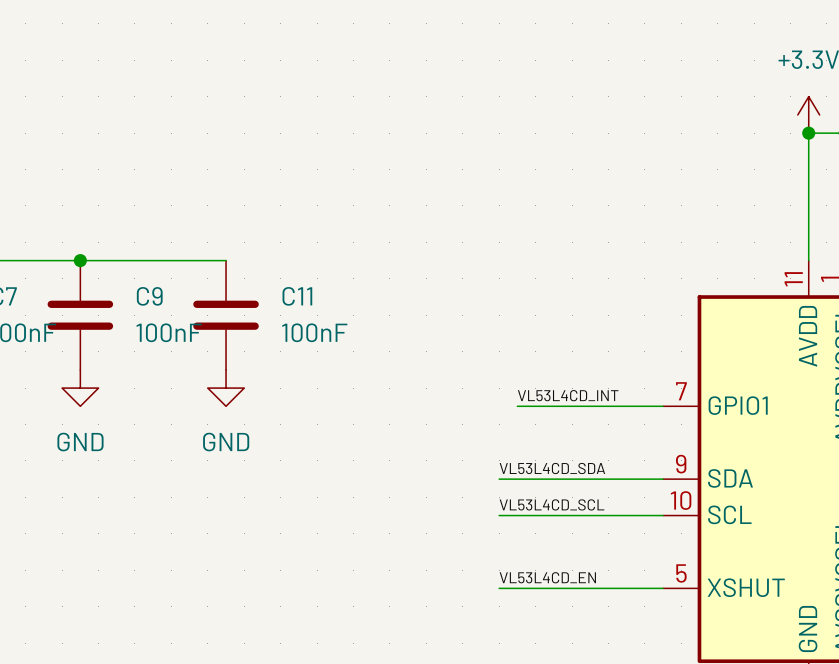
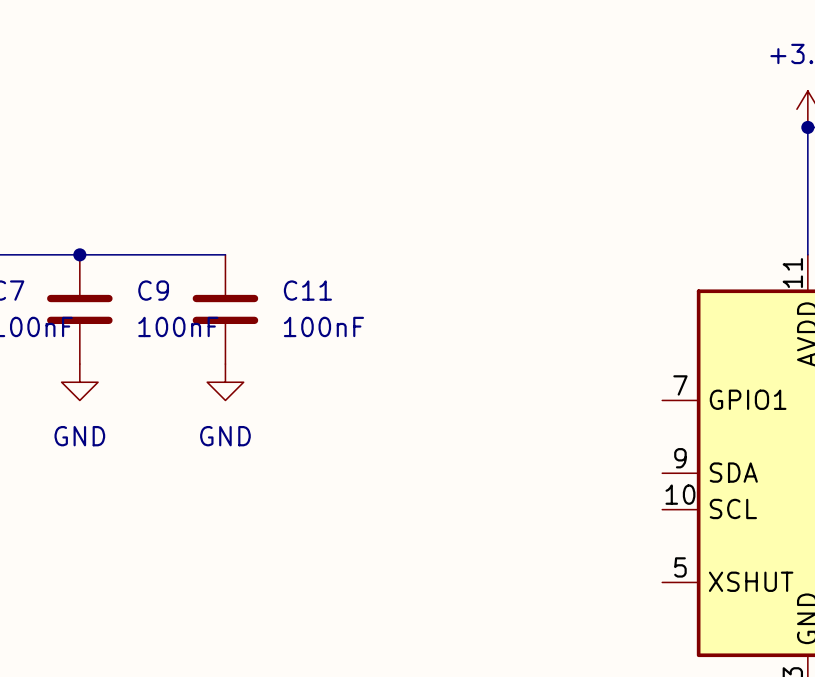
label: VL53L4CD_INT (568, 395) -> none
wire: (517, 406) (663, 406) -> none
label: VL53L4CD_SDA (552, 468) -> none
wire: (499, 479) (663, 479) -> none
label: VL53L4CD_SCL (552, 504) -> none
wire: (499, 515) (663, 515) -> none
label: VL53L4CD_EN (547, 577) -> none
wire: (499, 588) (663, 588) -> none

